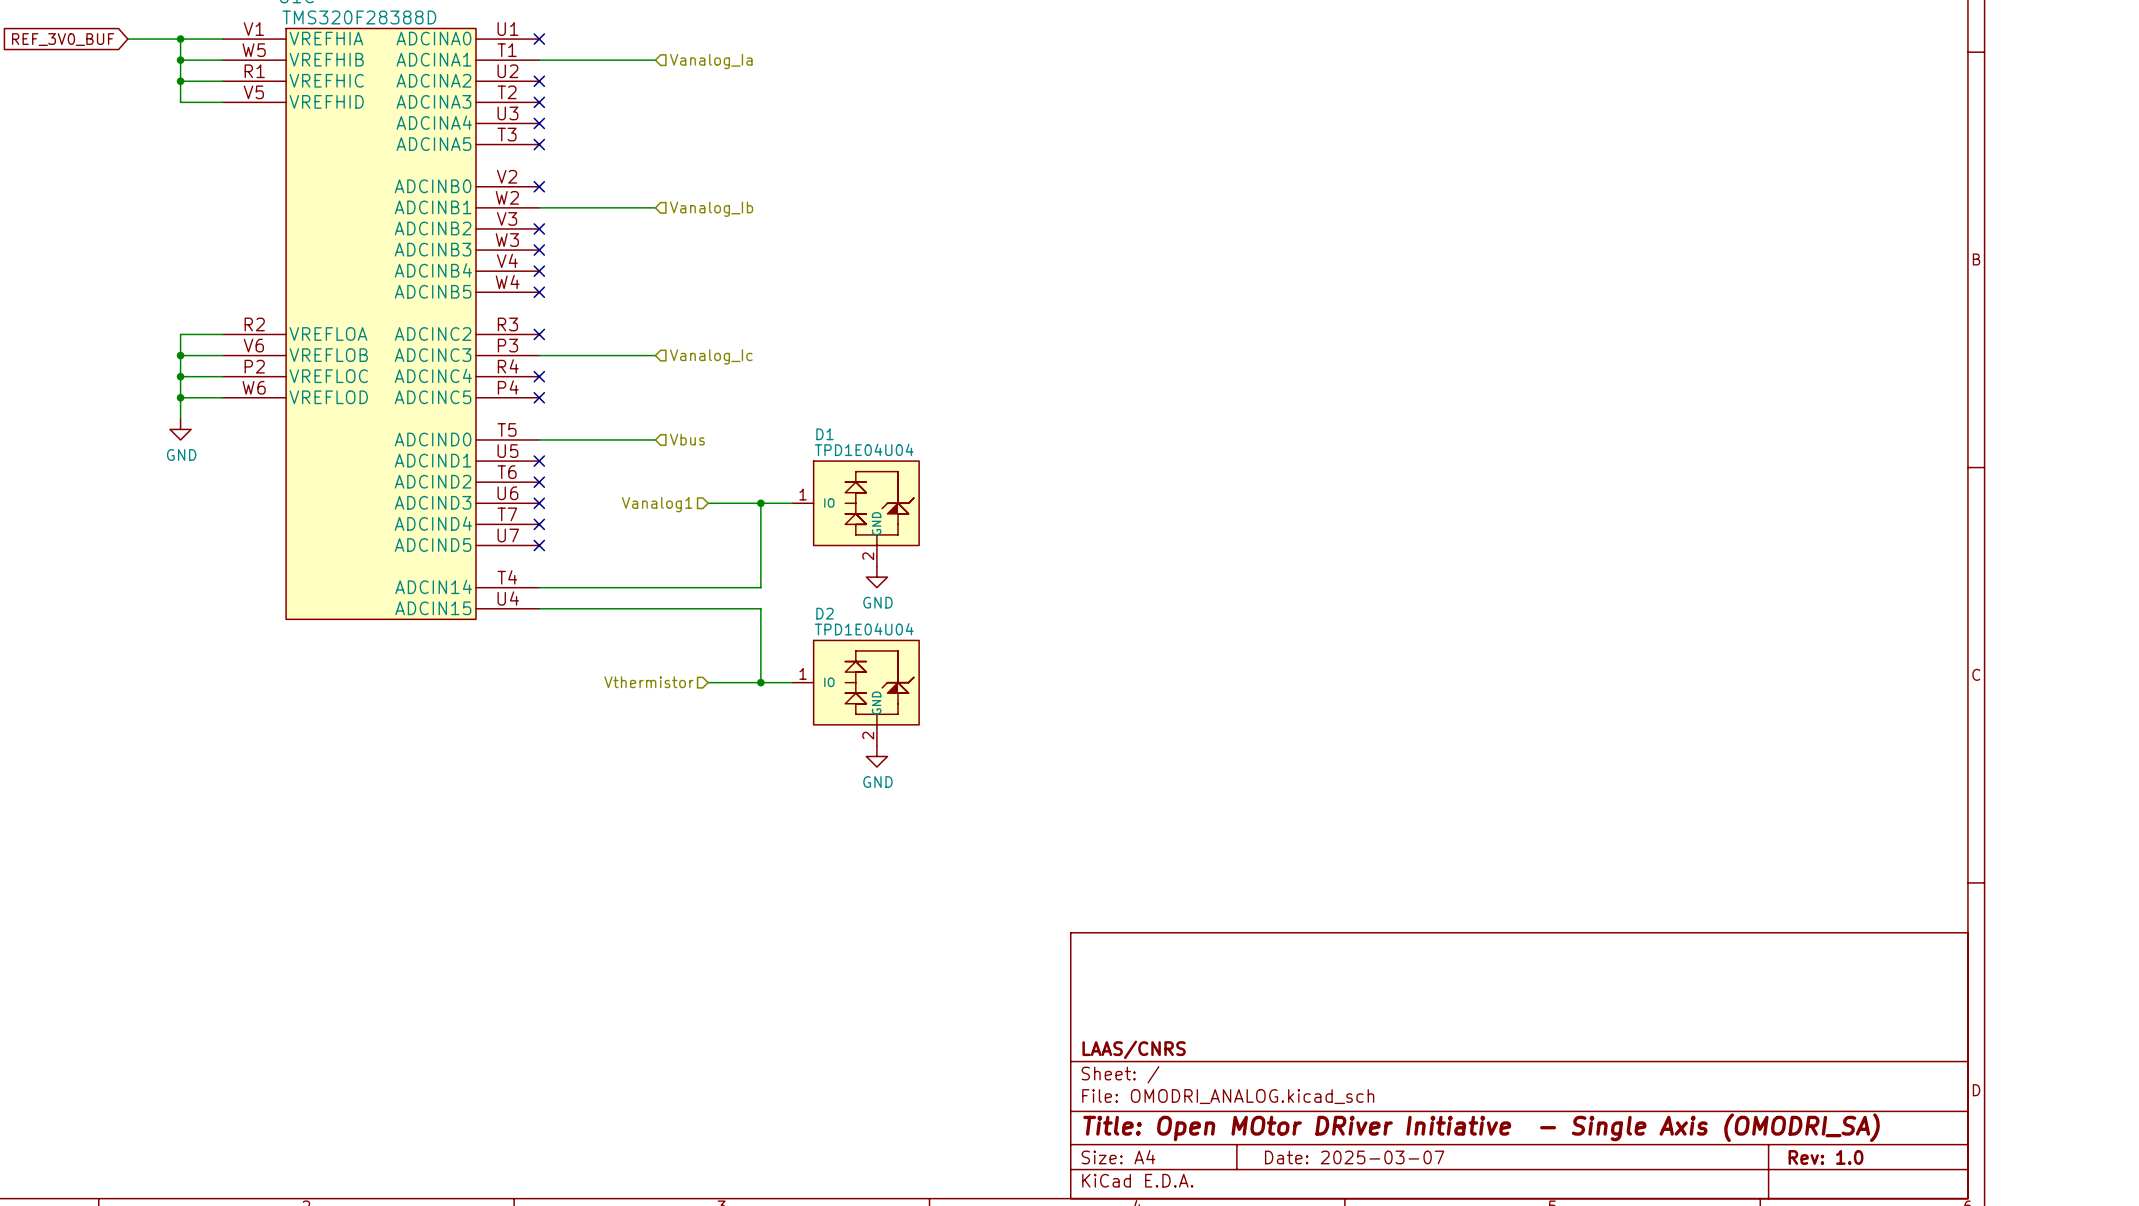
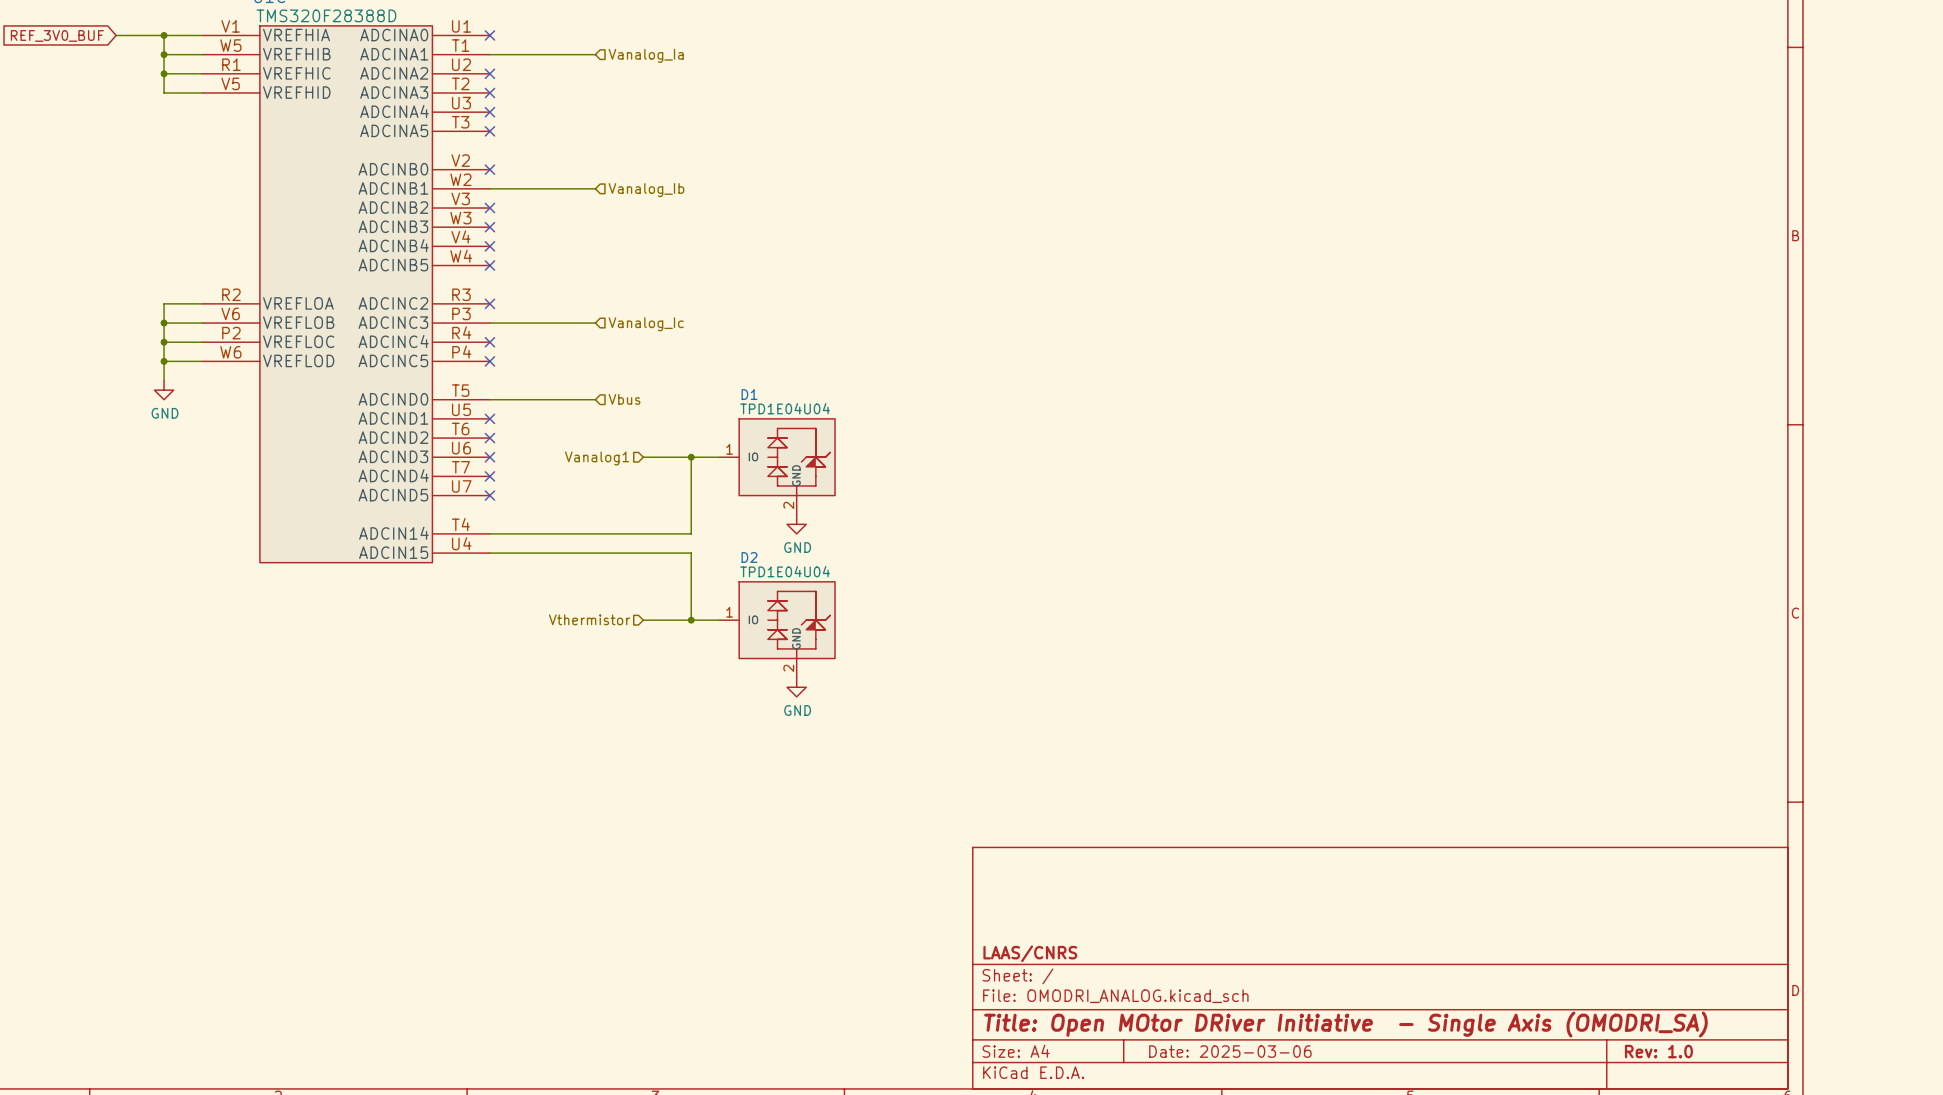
title block: Date: 2025-03-07 (1354, 1157) -> Date: 2025-03-06 (1230, 1051)

